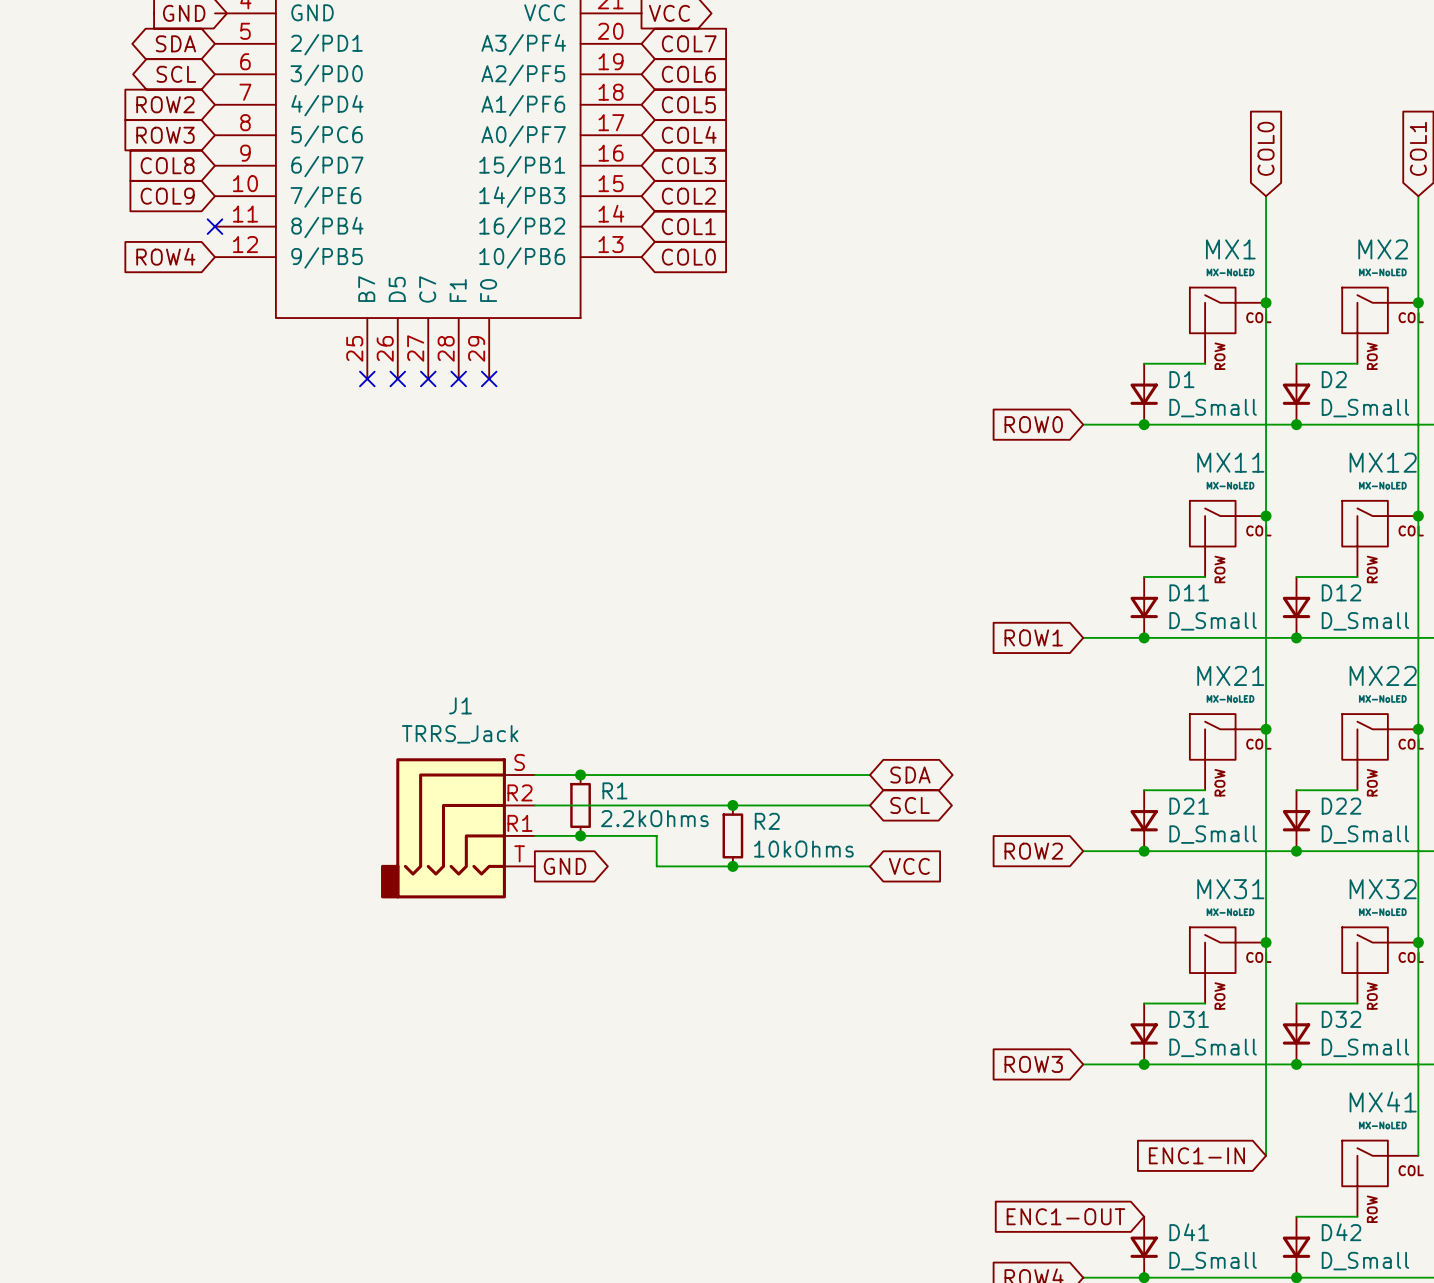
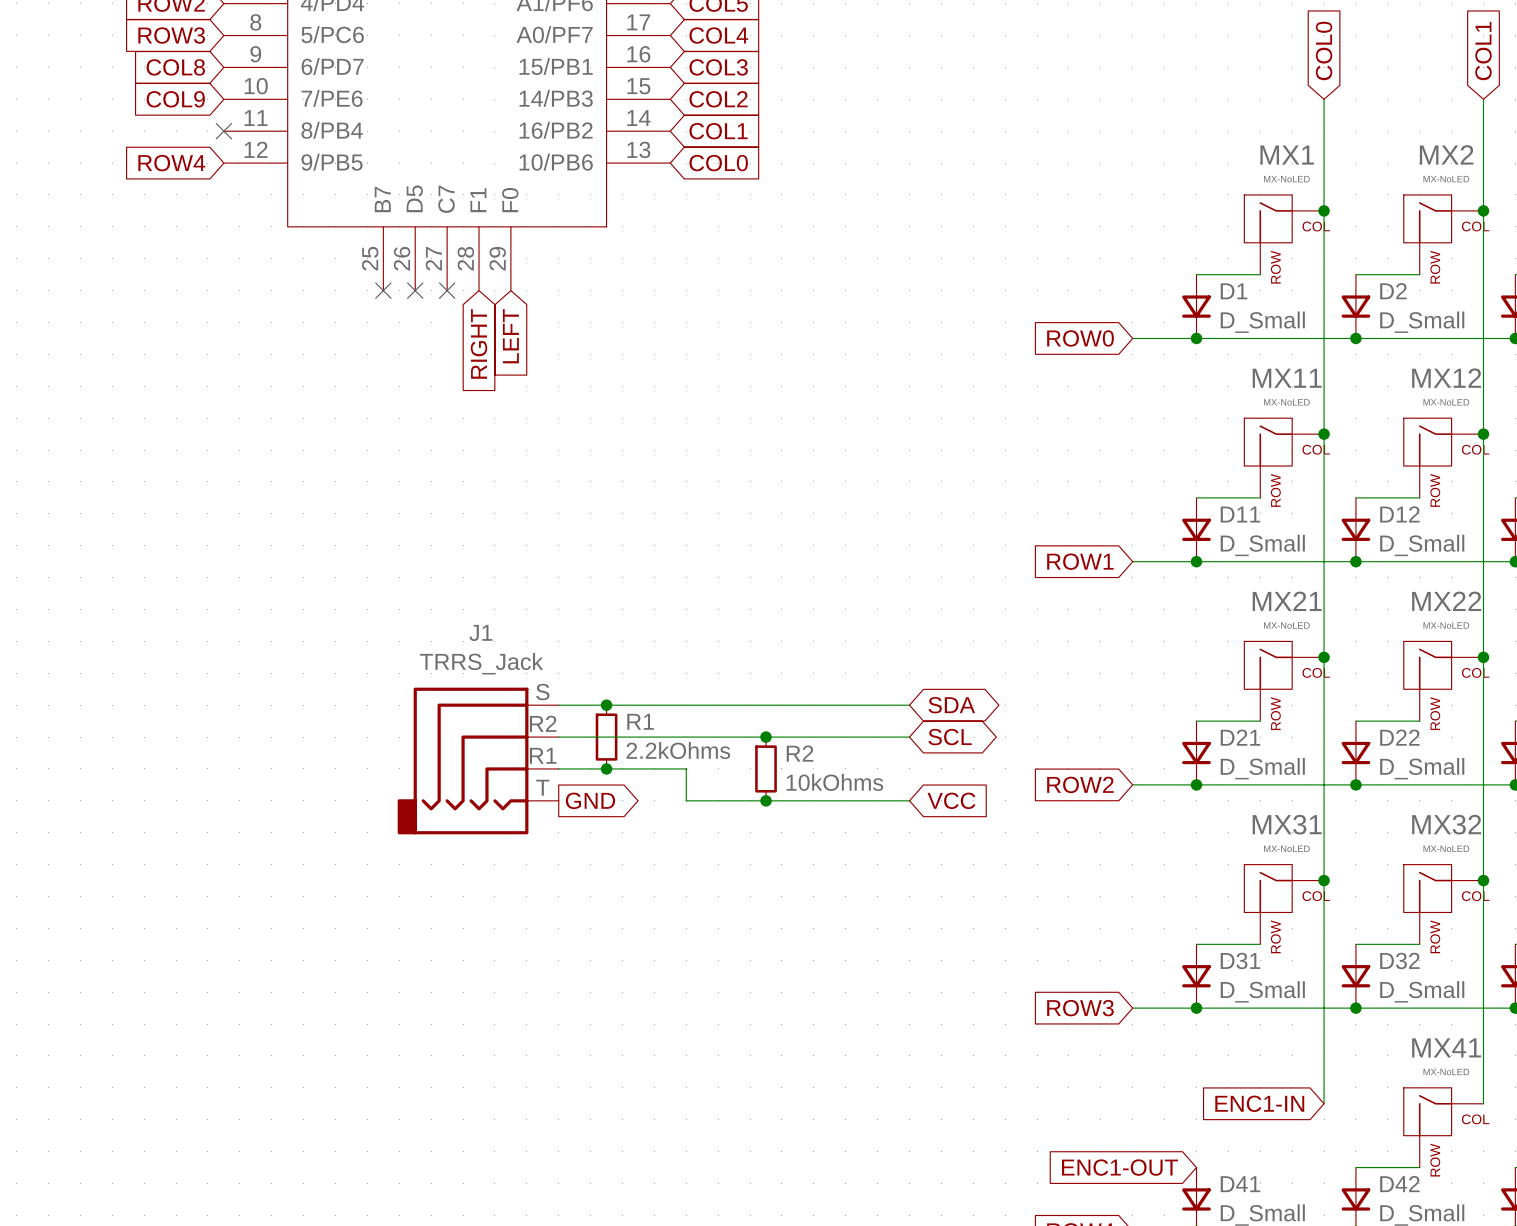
no-connect mark: (458, 378) -> none
no-connect mark: (489, 378) -> none
global label: none -> LEFT (510, 336)
global label: none -> RIGHT (479, 343)

